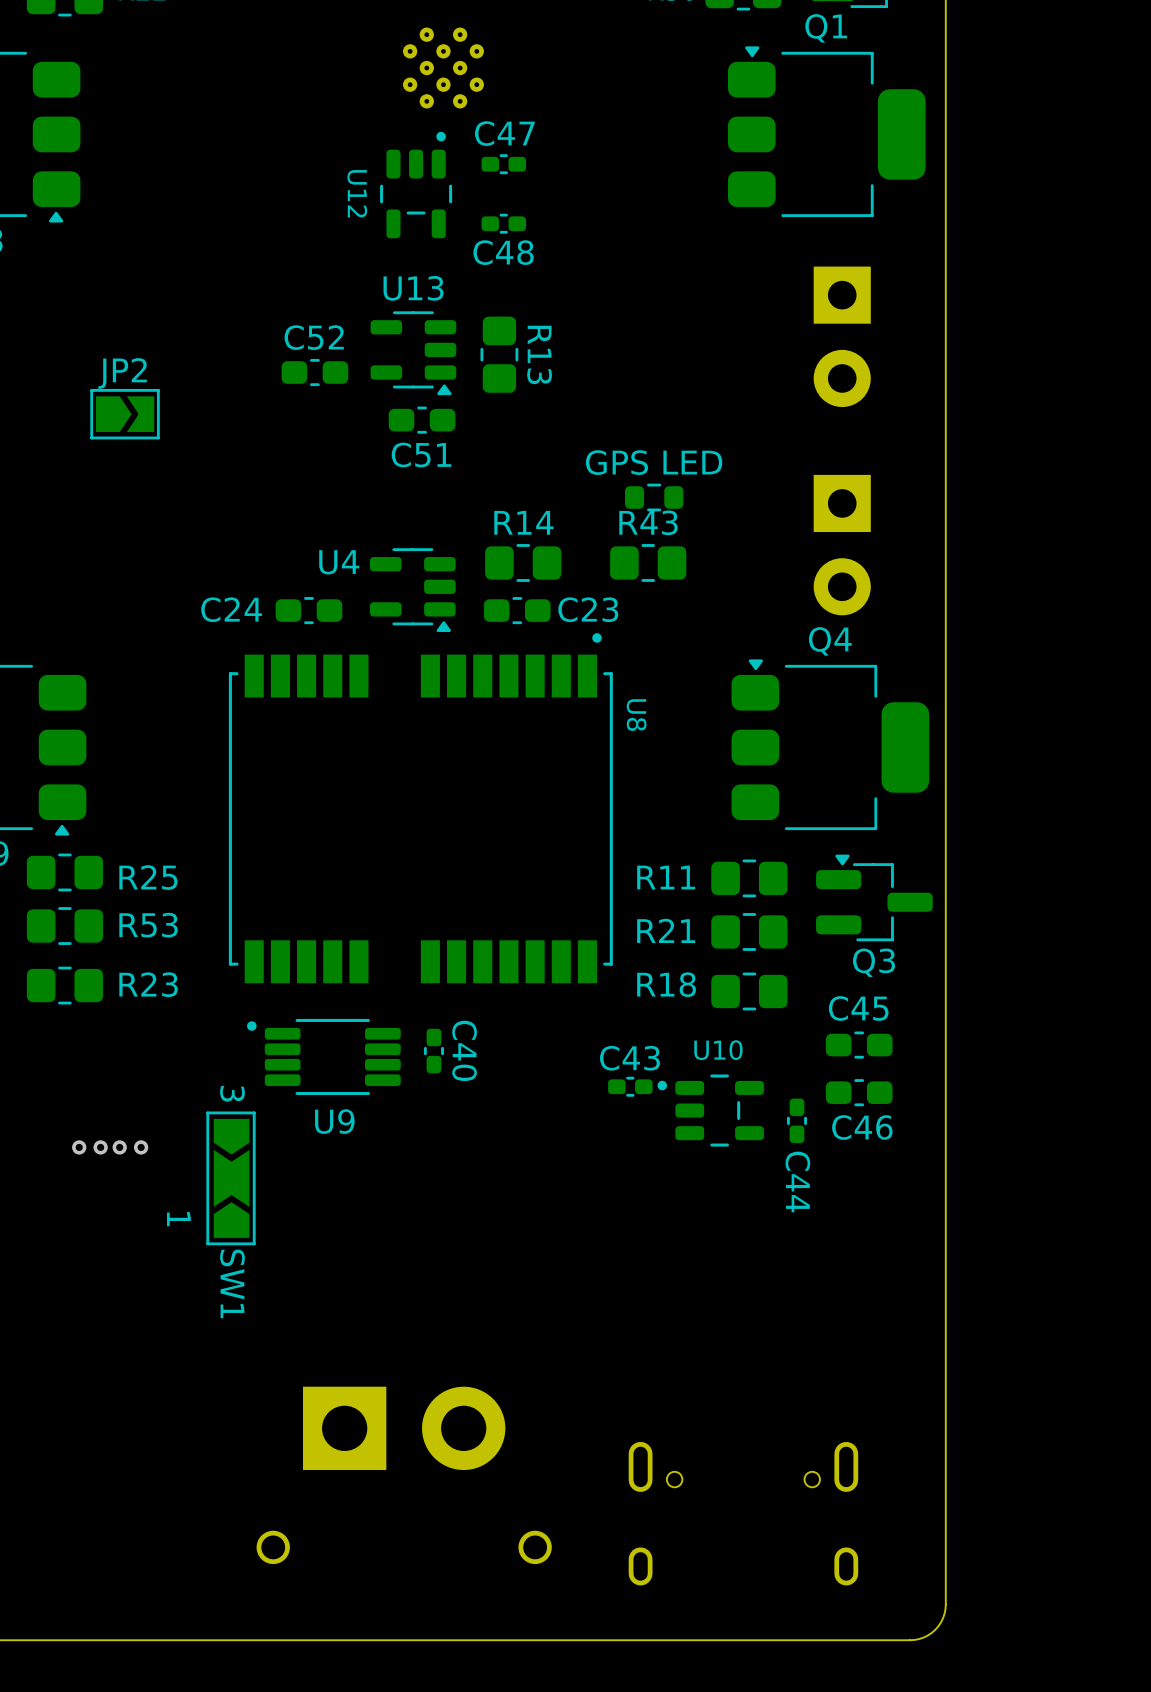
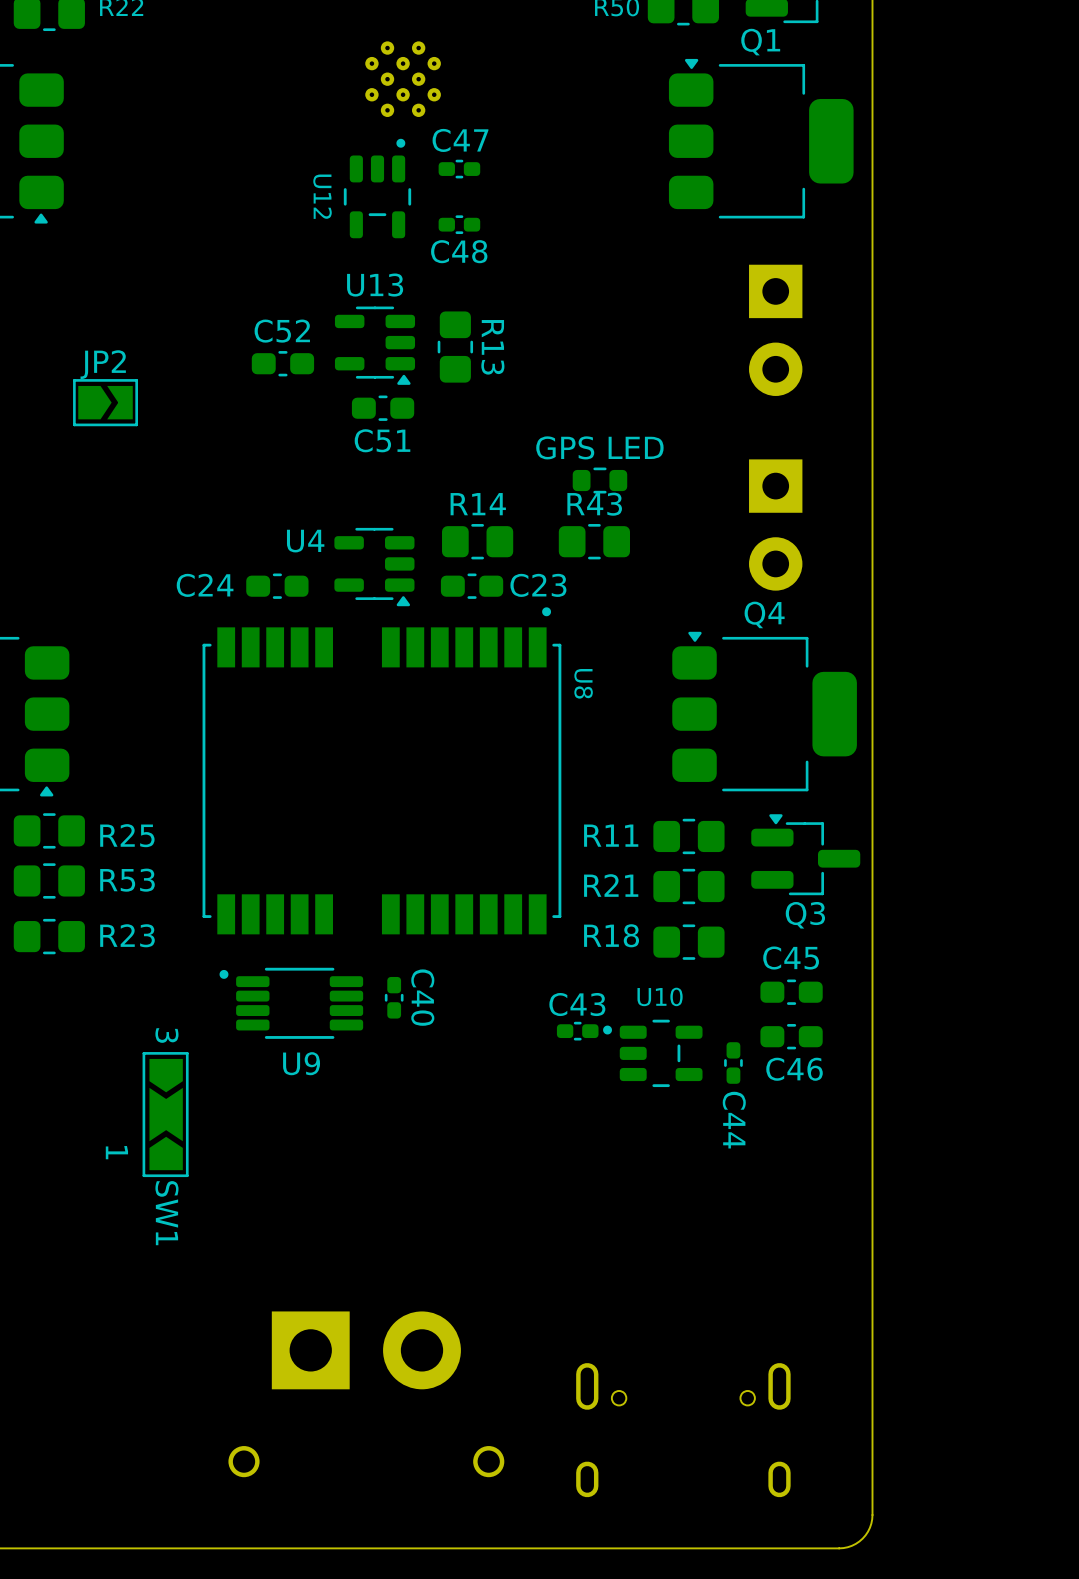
via: (79, 1147) -> none
via: (100, 1147) -> none
via: (119, 1147) -> none
via: (141, 1147) -> none
SW1 position: (230, 1178) -> (165, 1114)

